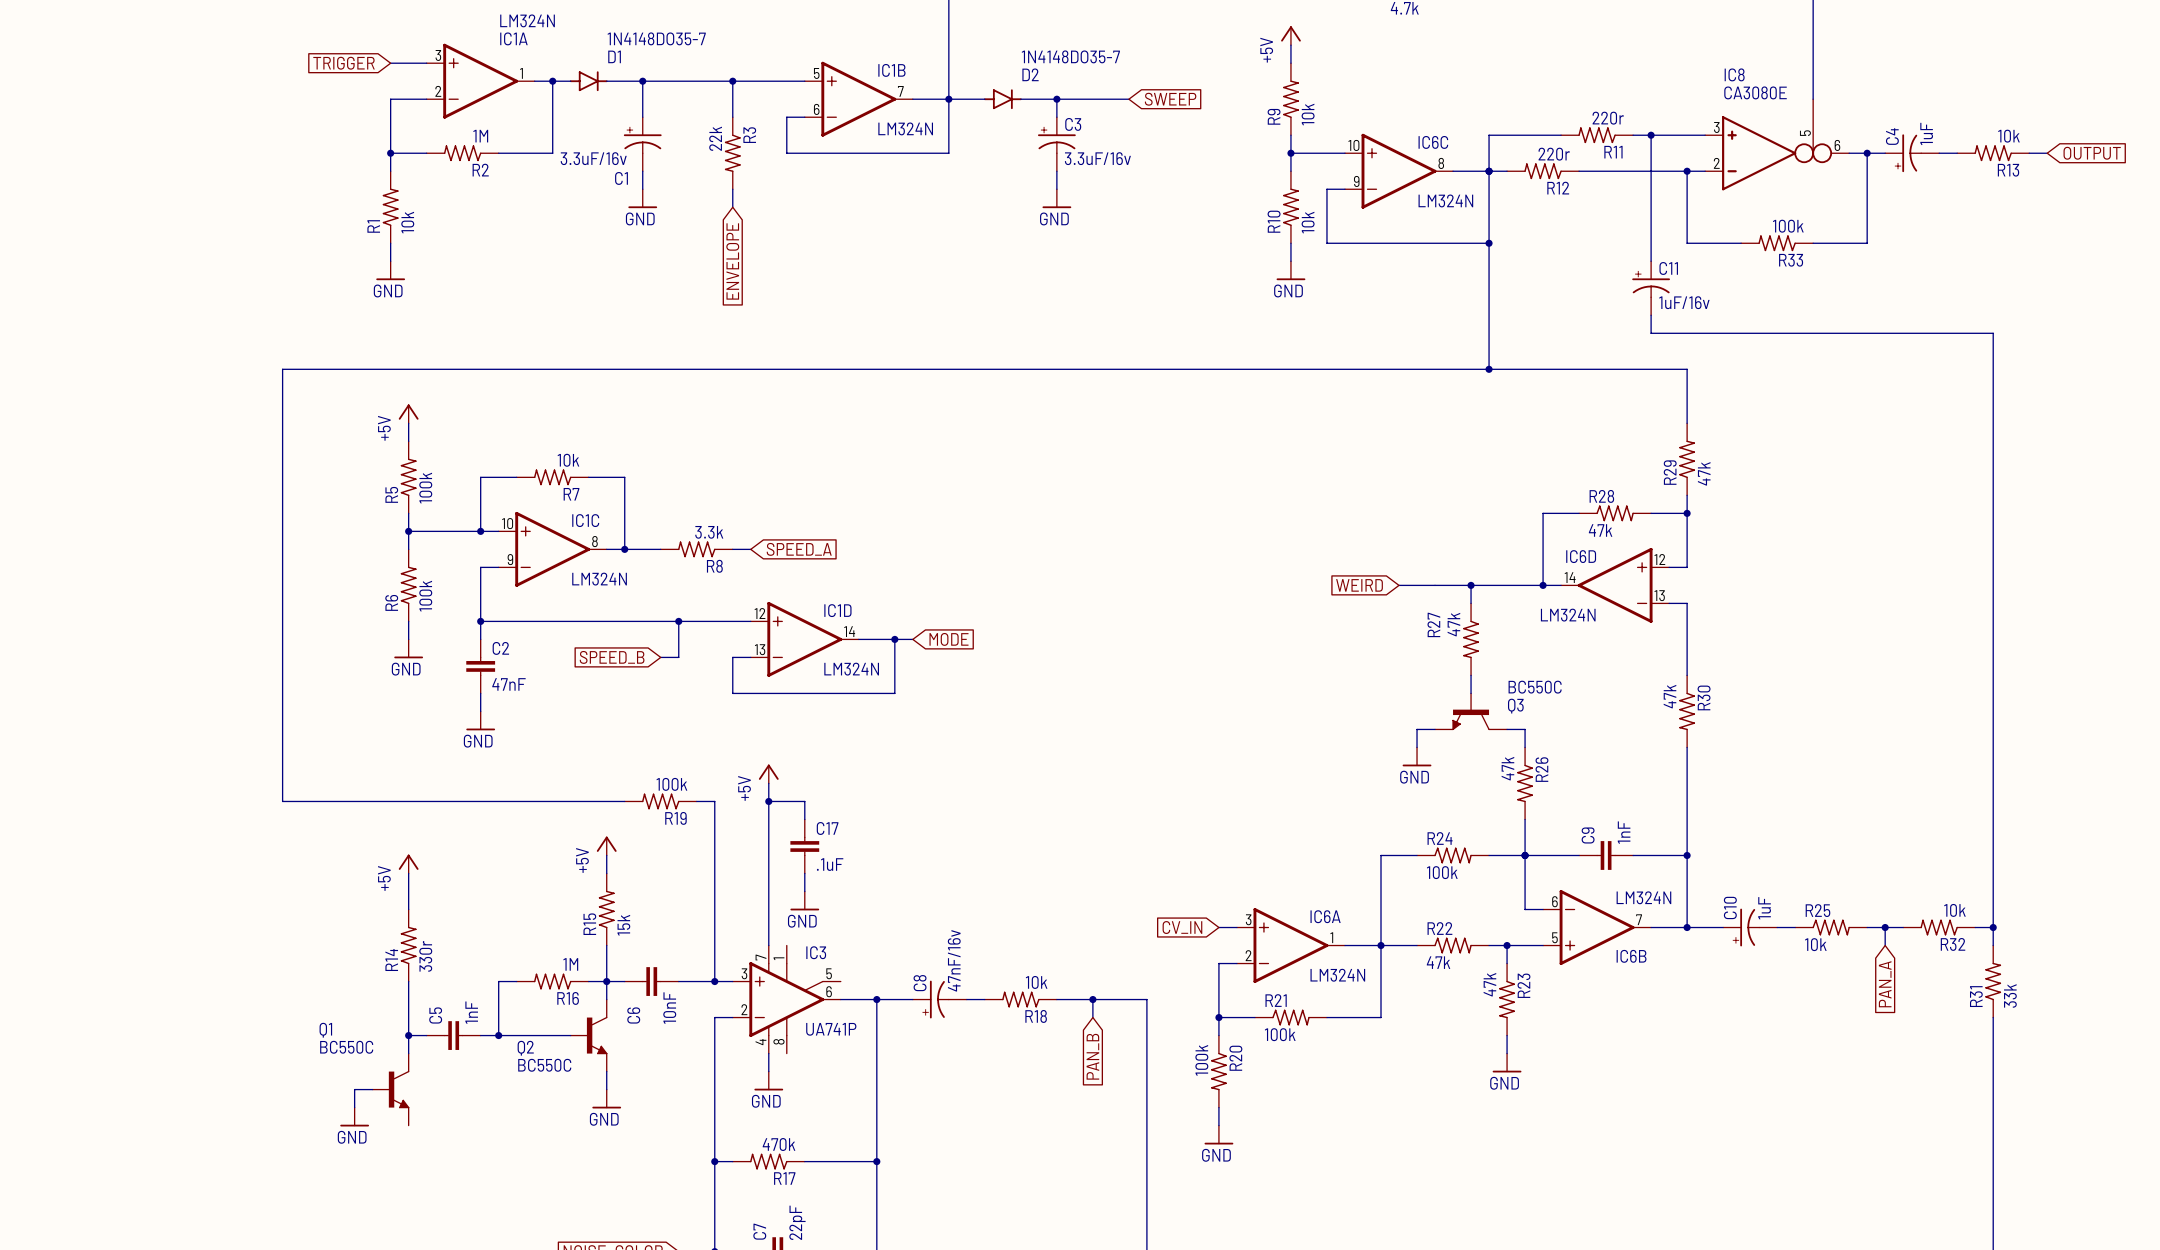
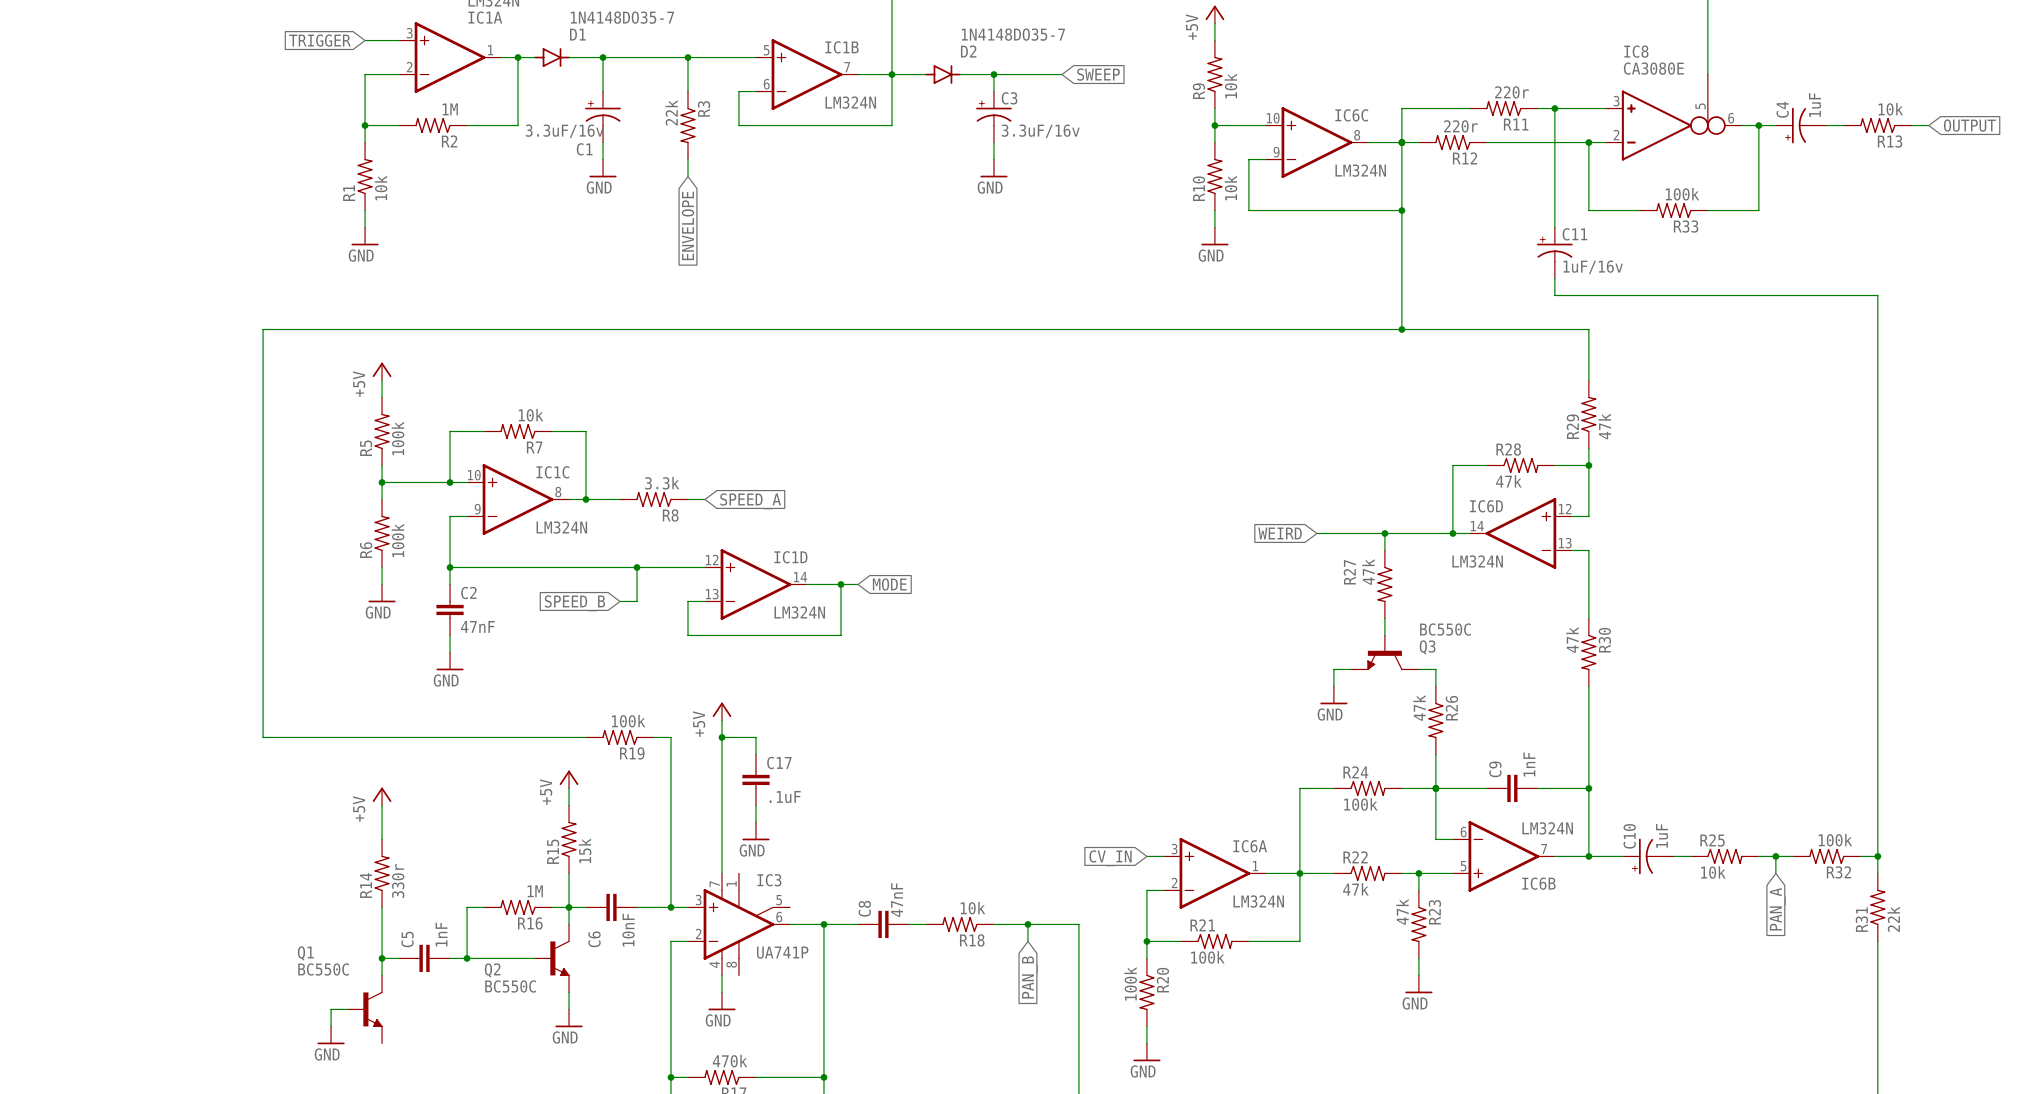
R32 value: 10k (1954, 910) -> 100k (1835, 840)
C8 value: 47nF/16v (954, 960) -> 47nF (897, 900)
C8 symbol: [912, 980, 967, 1019] -> [857, 910, 909, 939]
R31 value: 33k (2010, 995) -> 22k (1893, 919)

